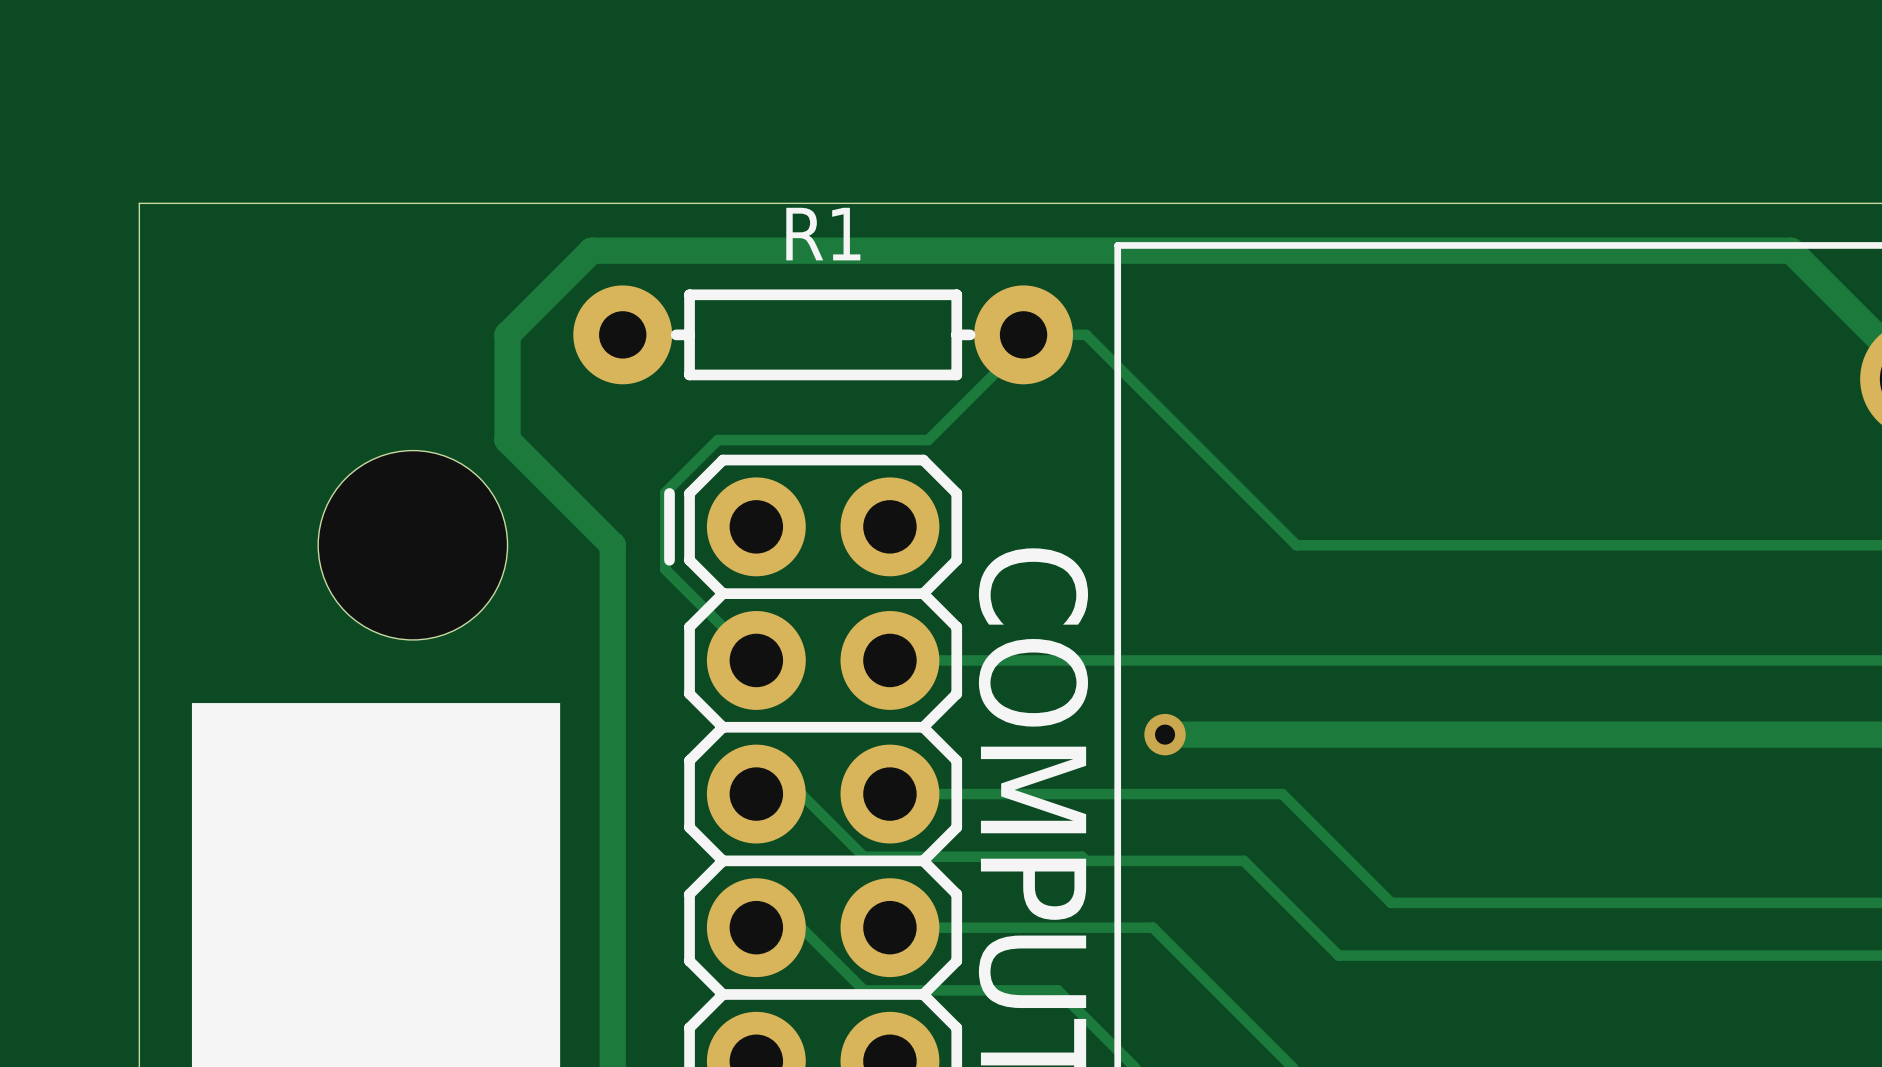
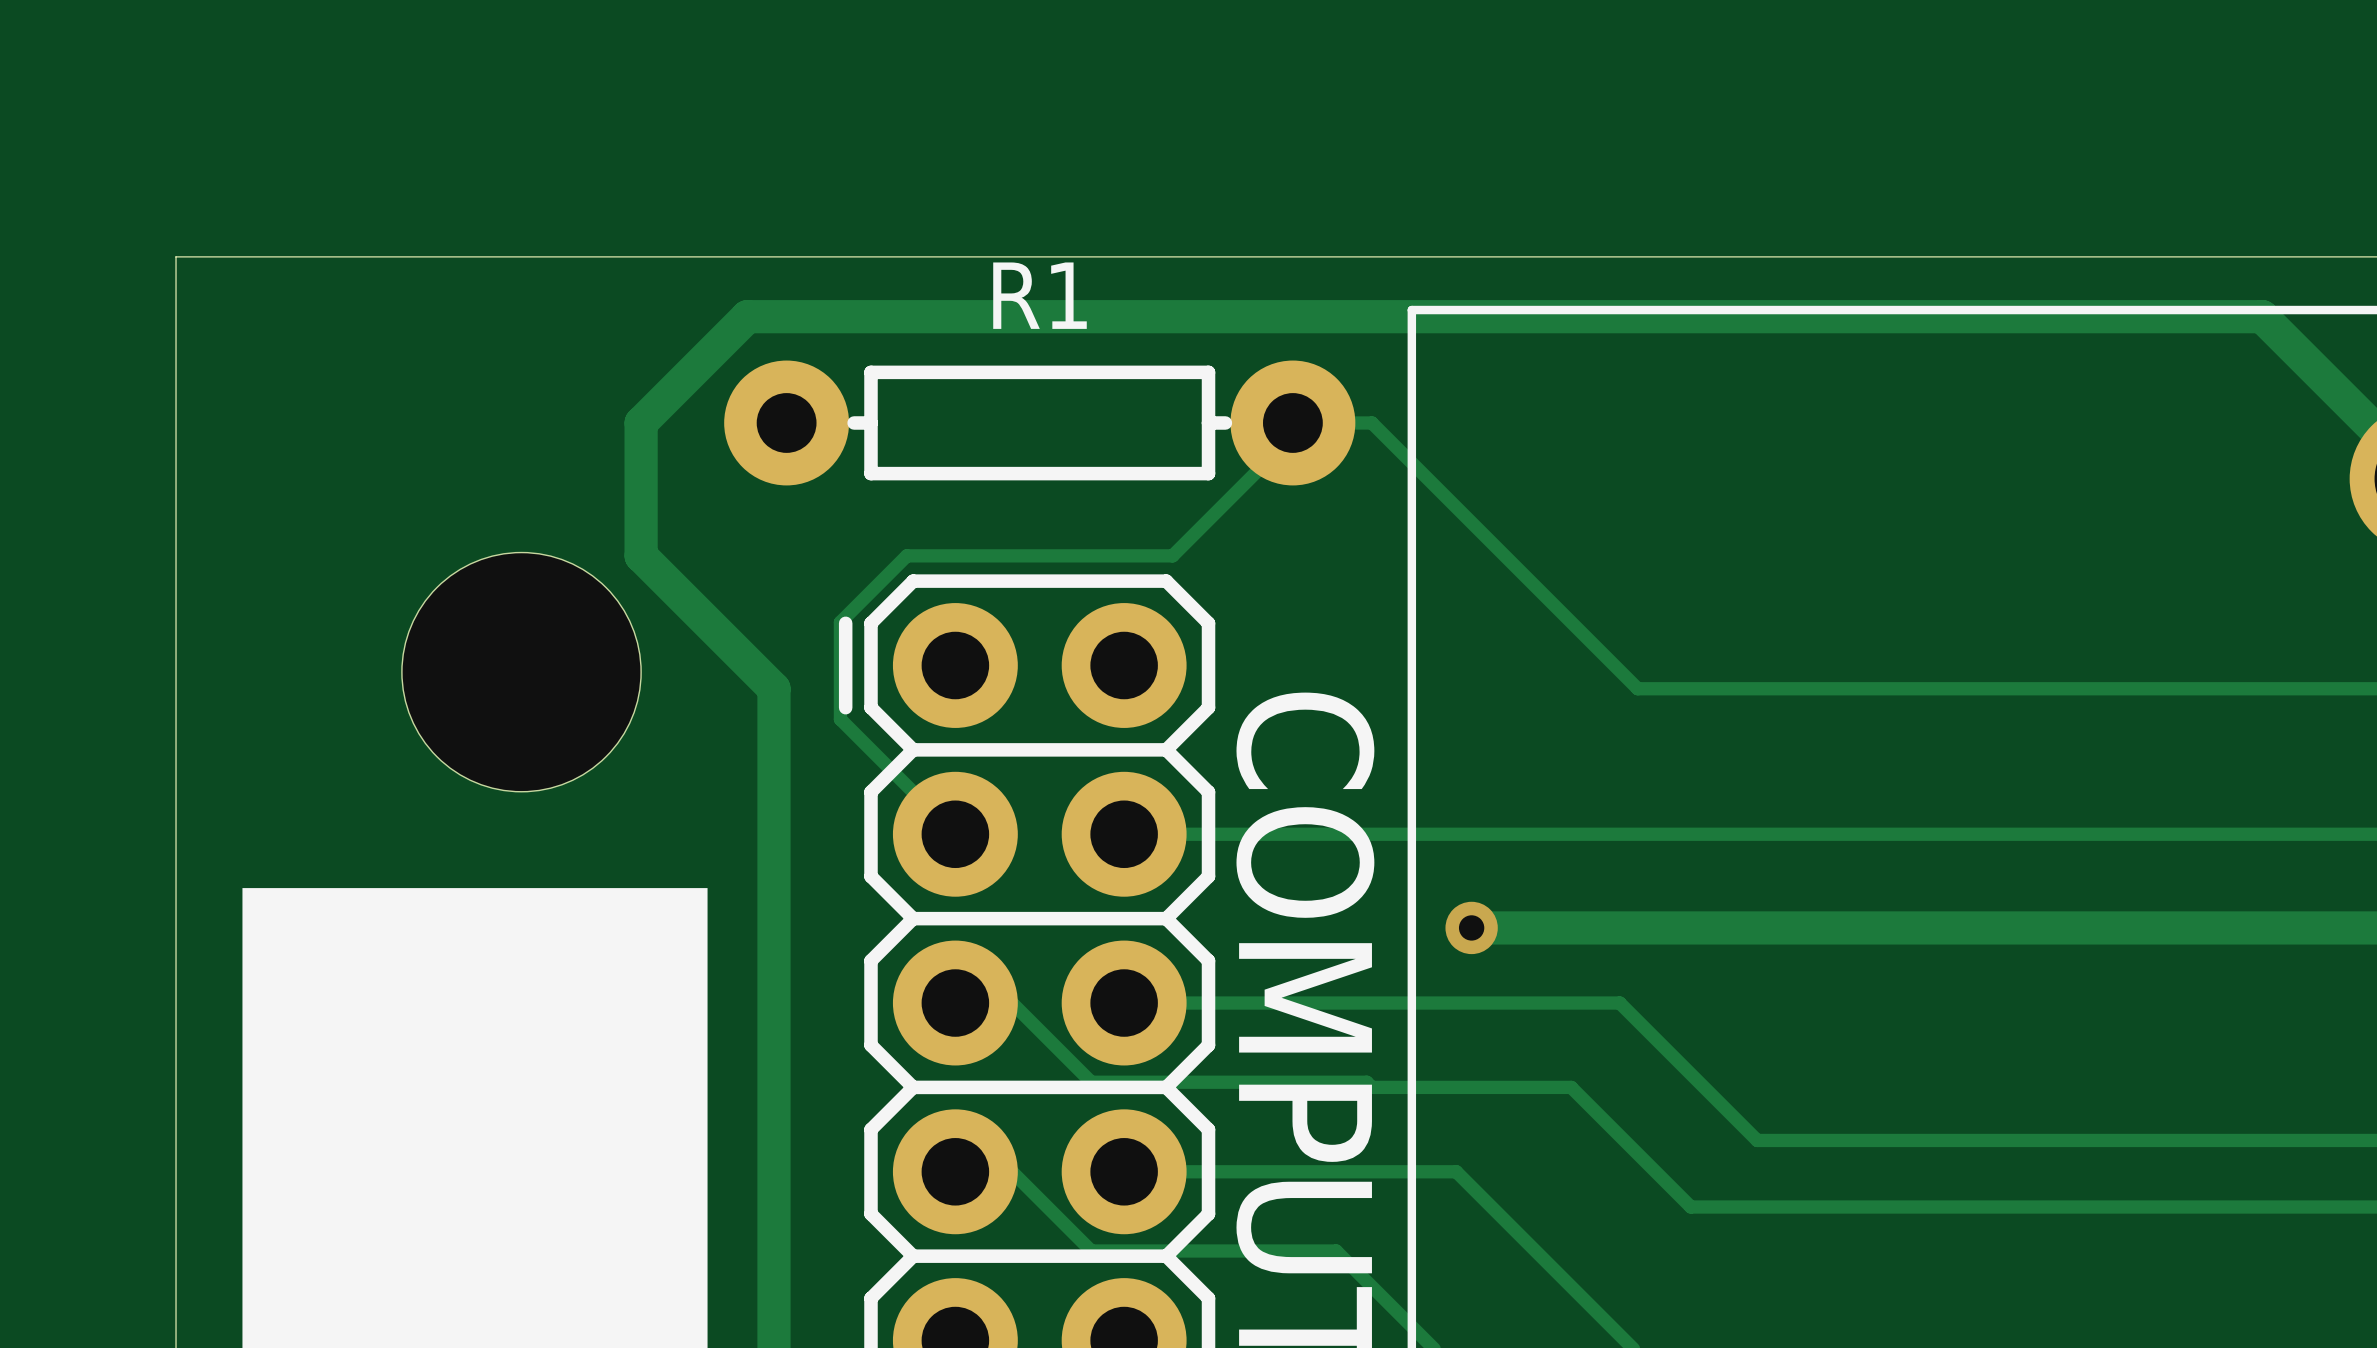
hole position: (412, 545) -> (521, 672)

